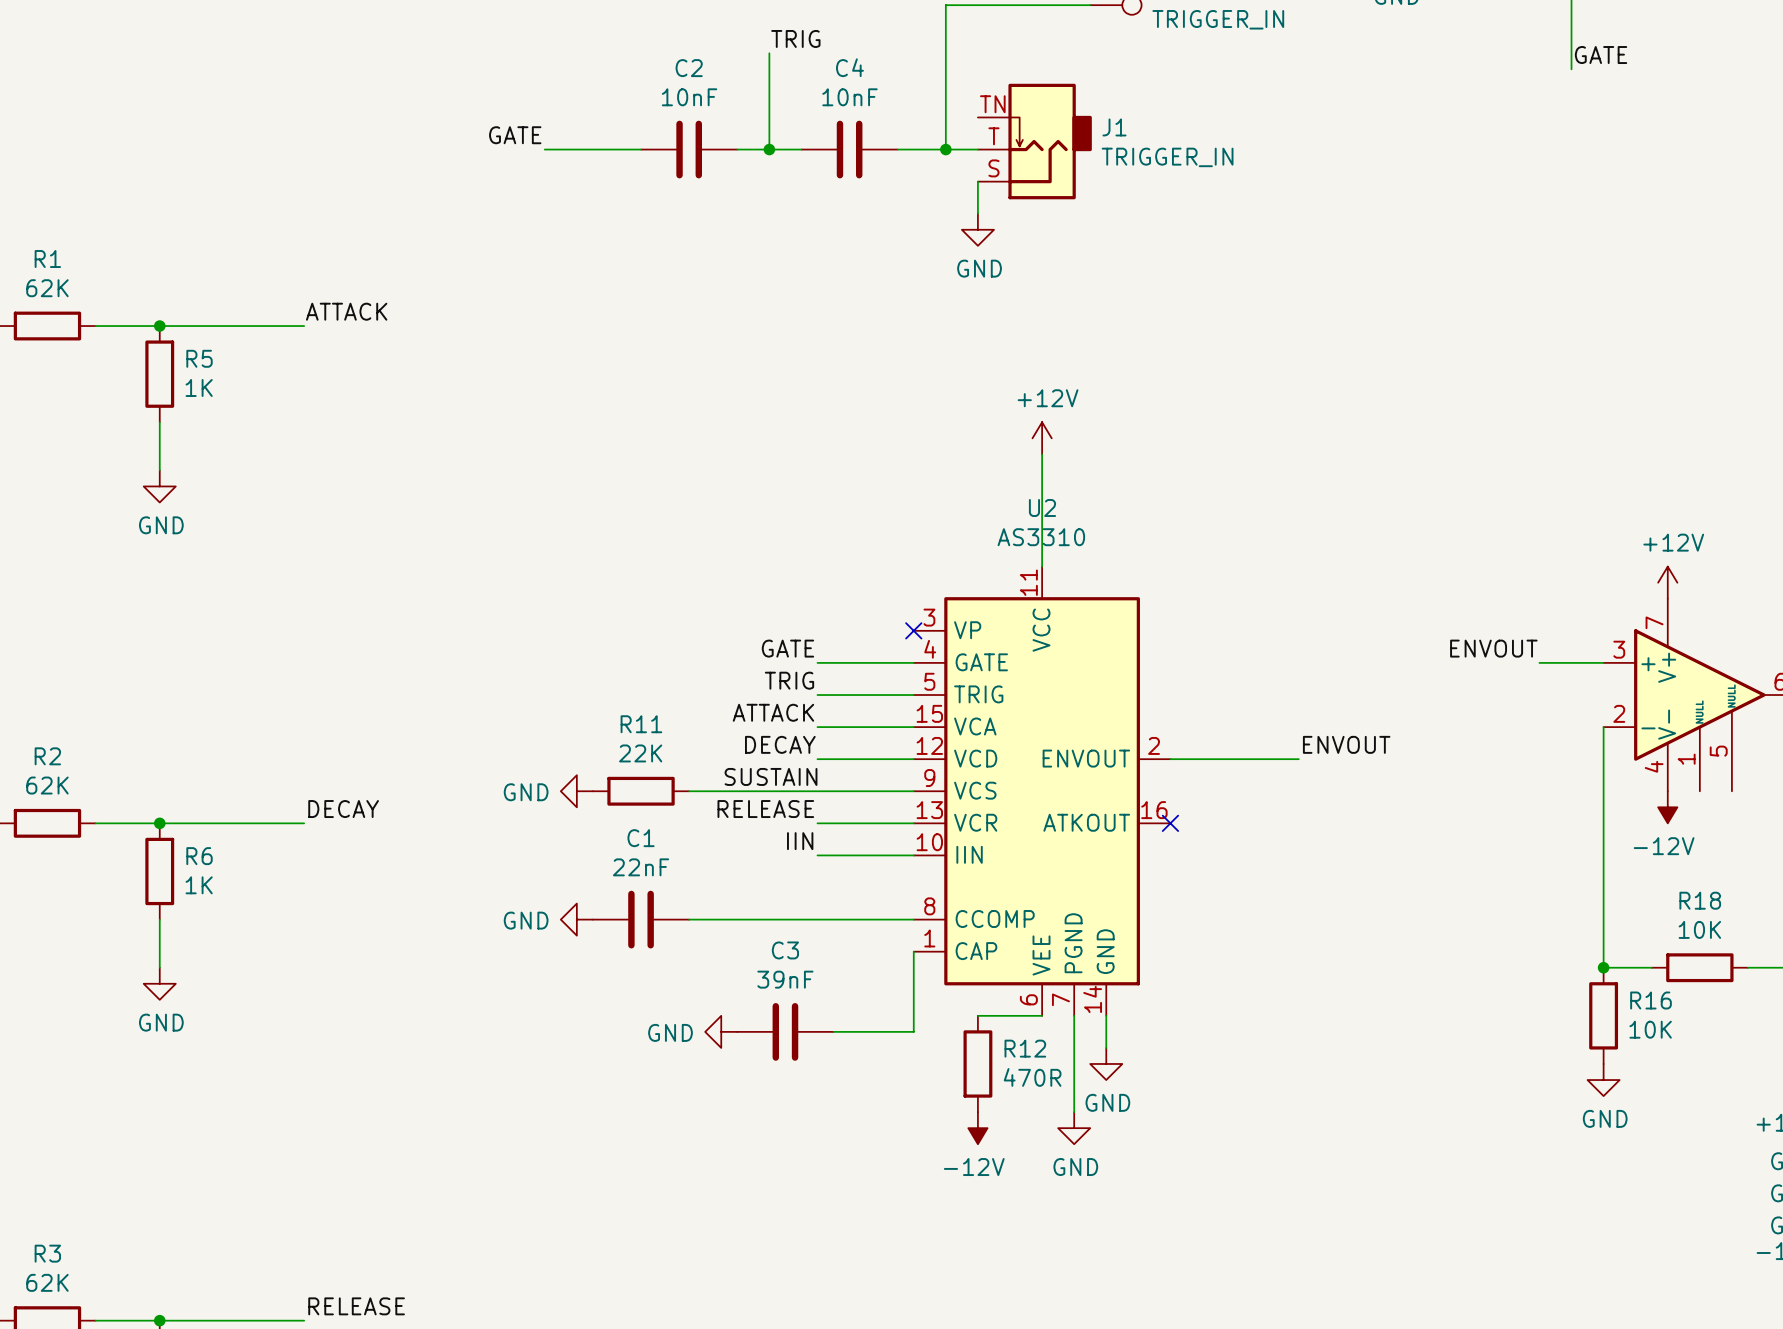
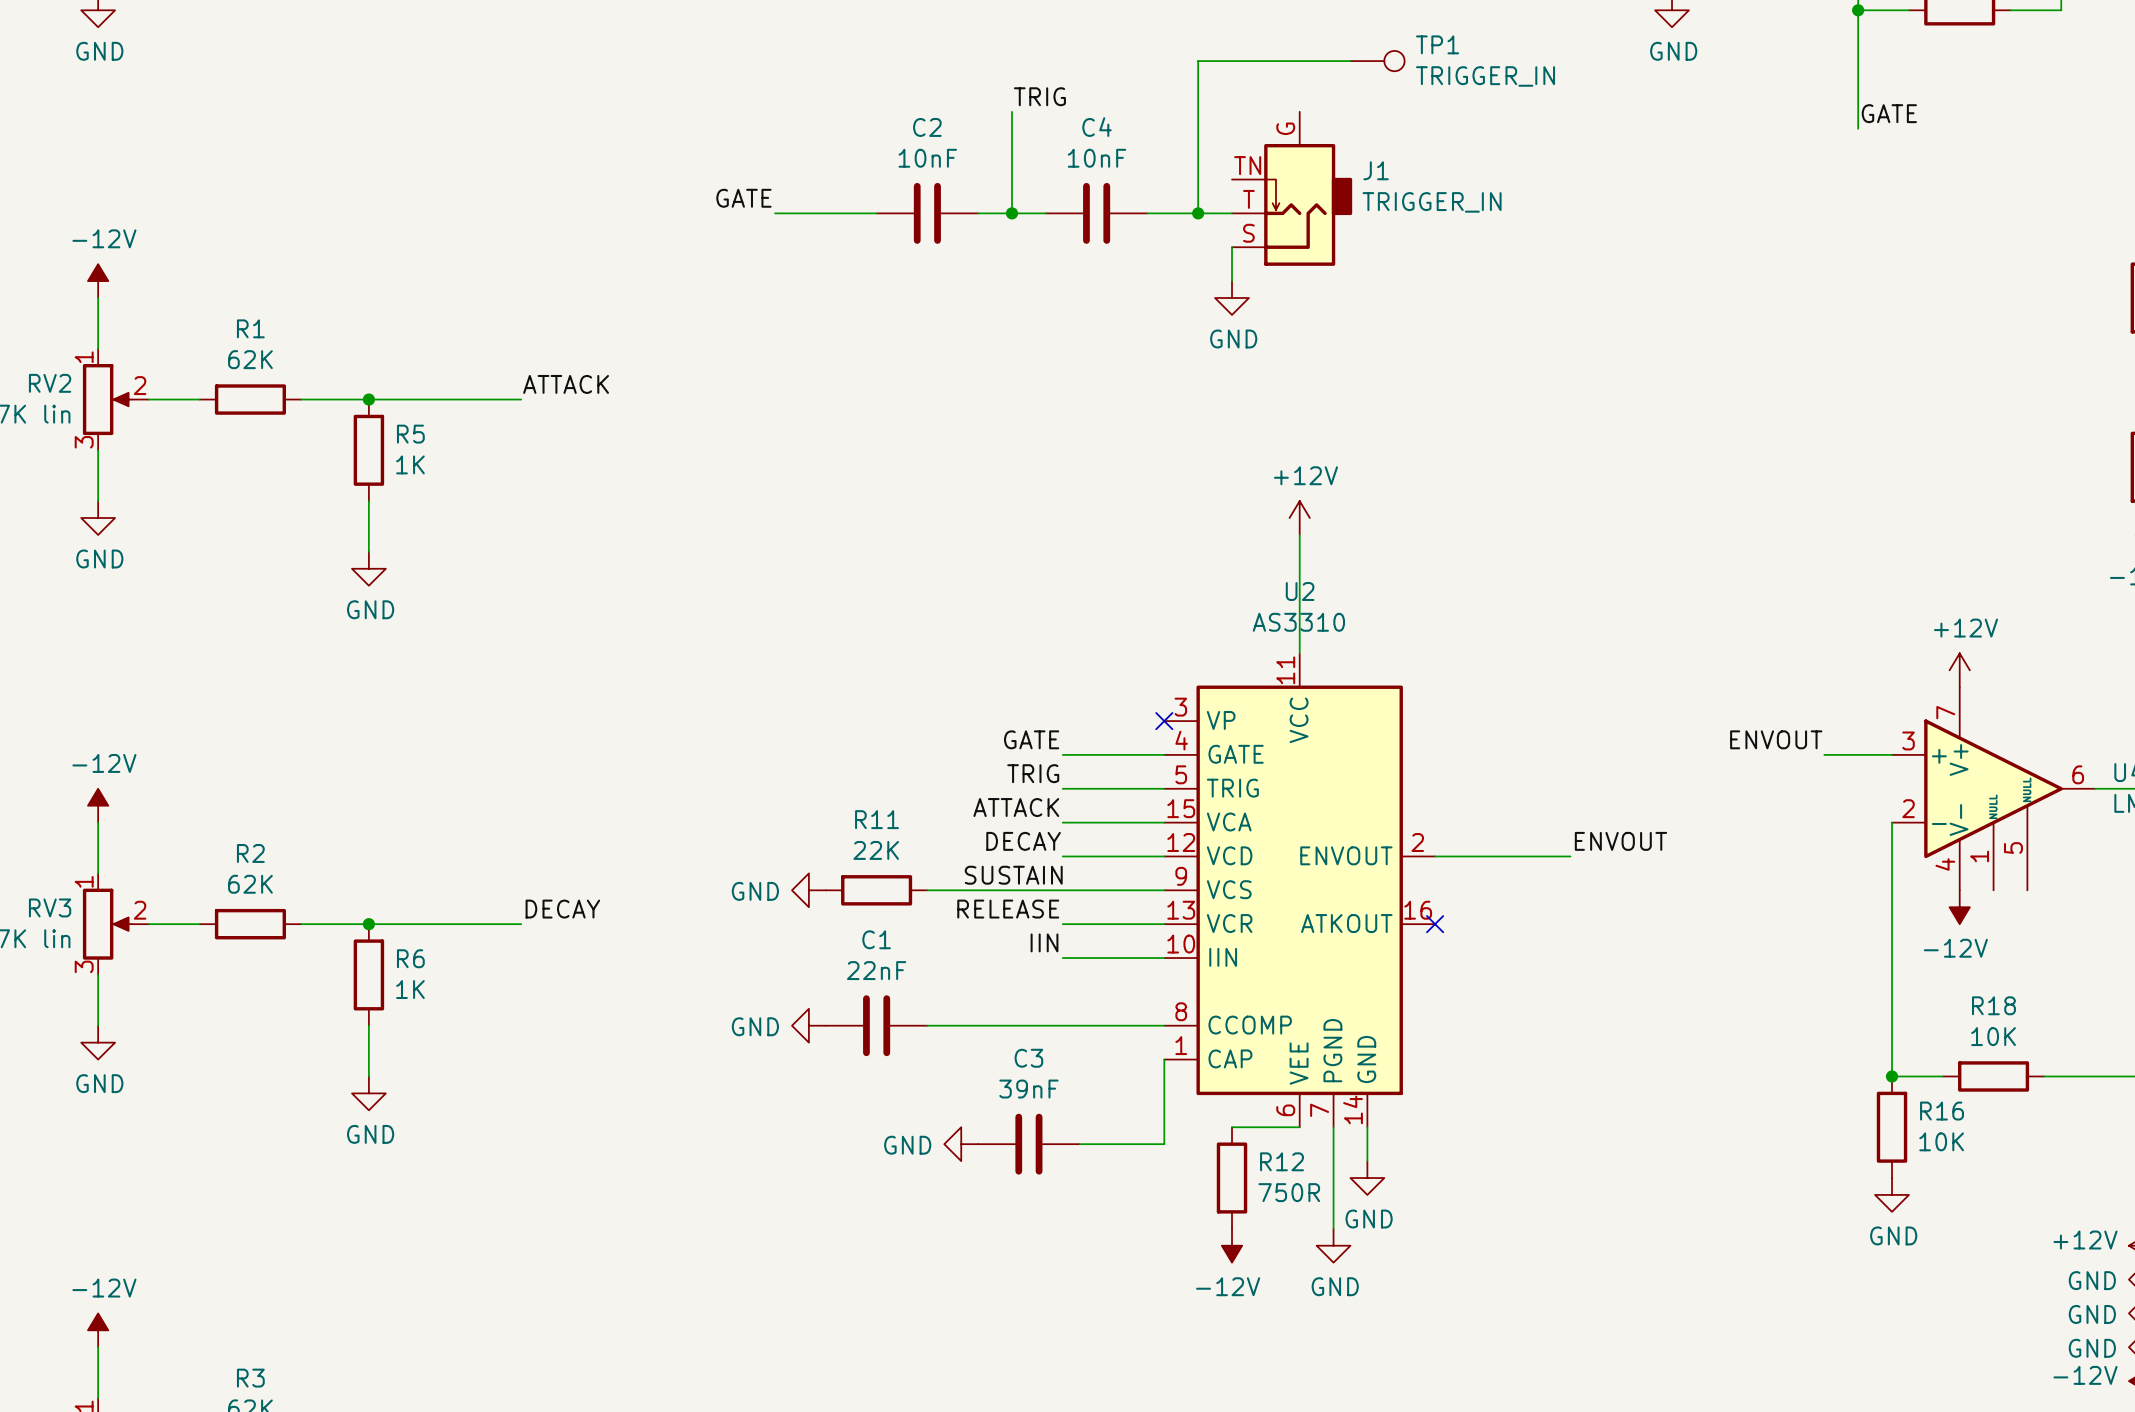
J1 symbol: [977, 83, 1092, 200] -> [1232, 111, 1353, 266]
R12 value: 470R (1032, 1077) -> 750R (1289, 1192)

